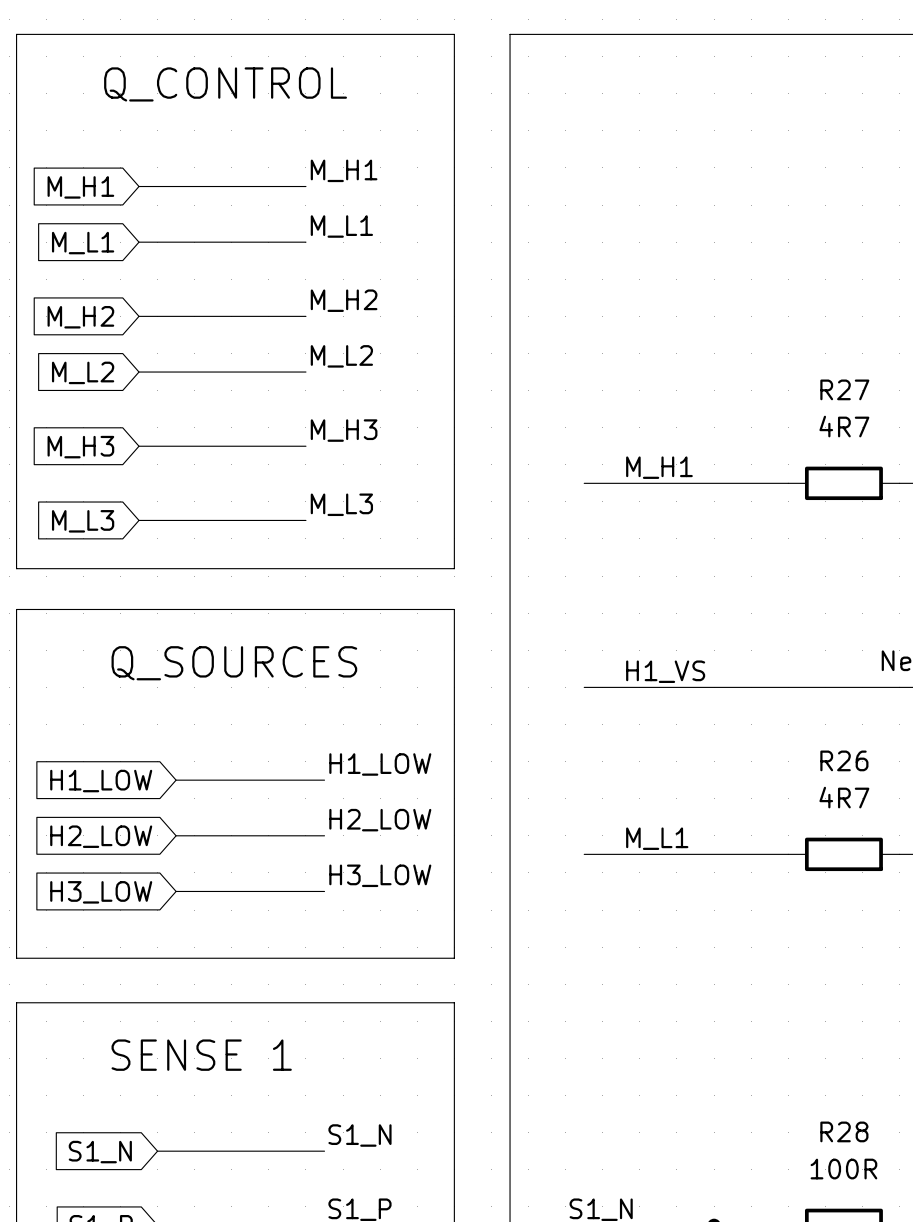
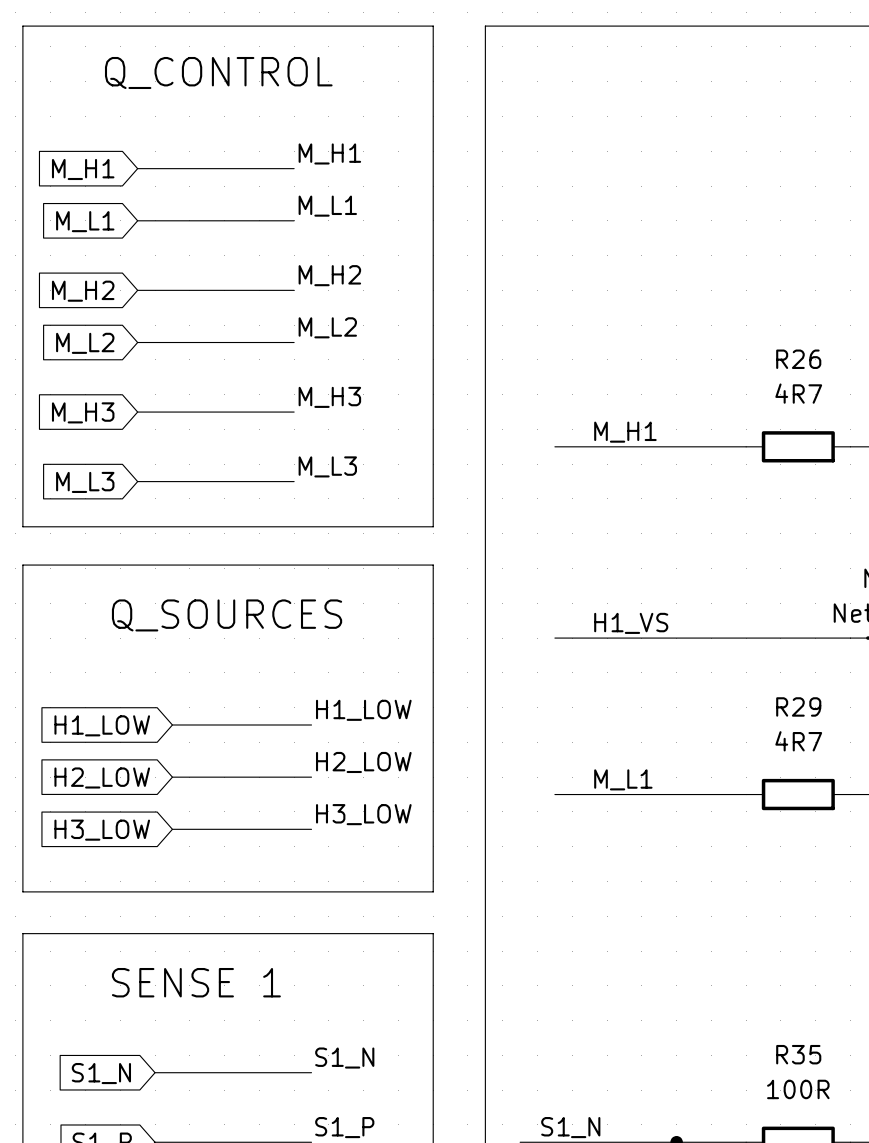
R27 name: R27 (844, 389) -> R26 (798, 359)
R26 name: R26 (844, 760) -> R29 (798, 706)
R28 name: R28 (844, 1131) -> R35 (798, 1054)

